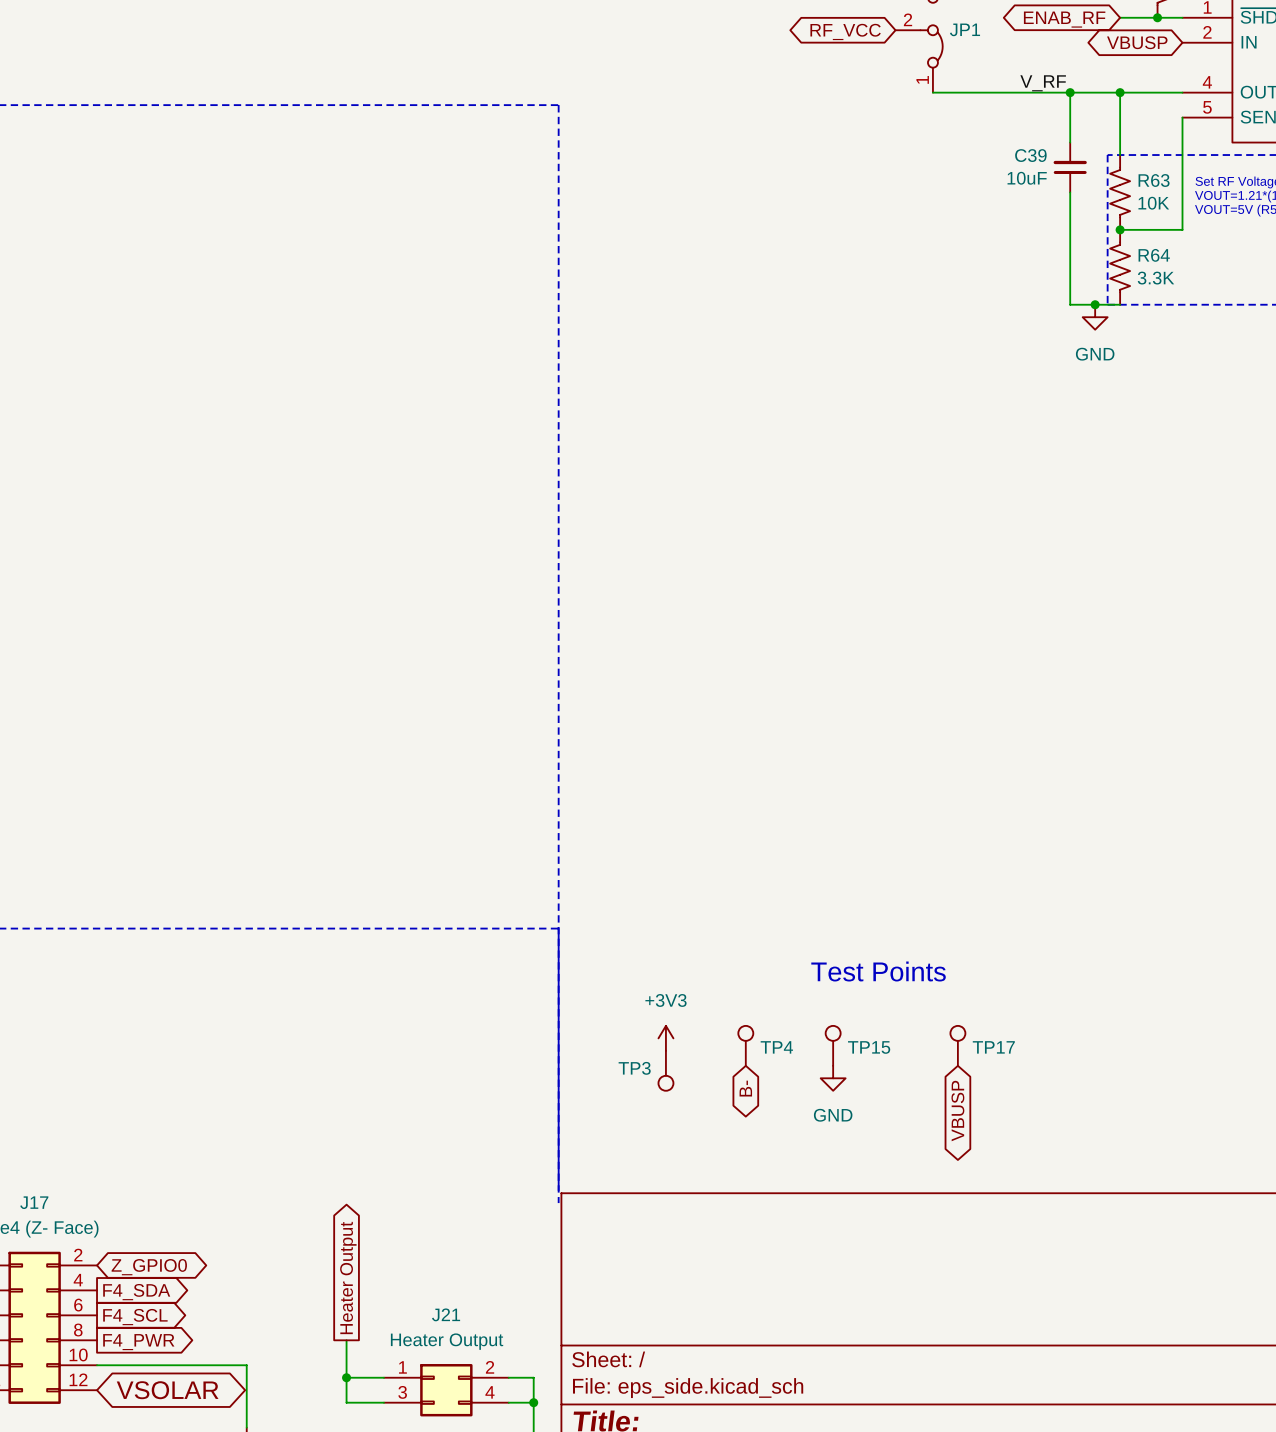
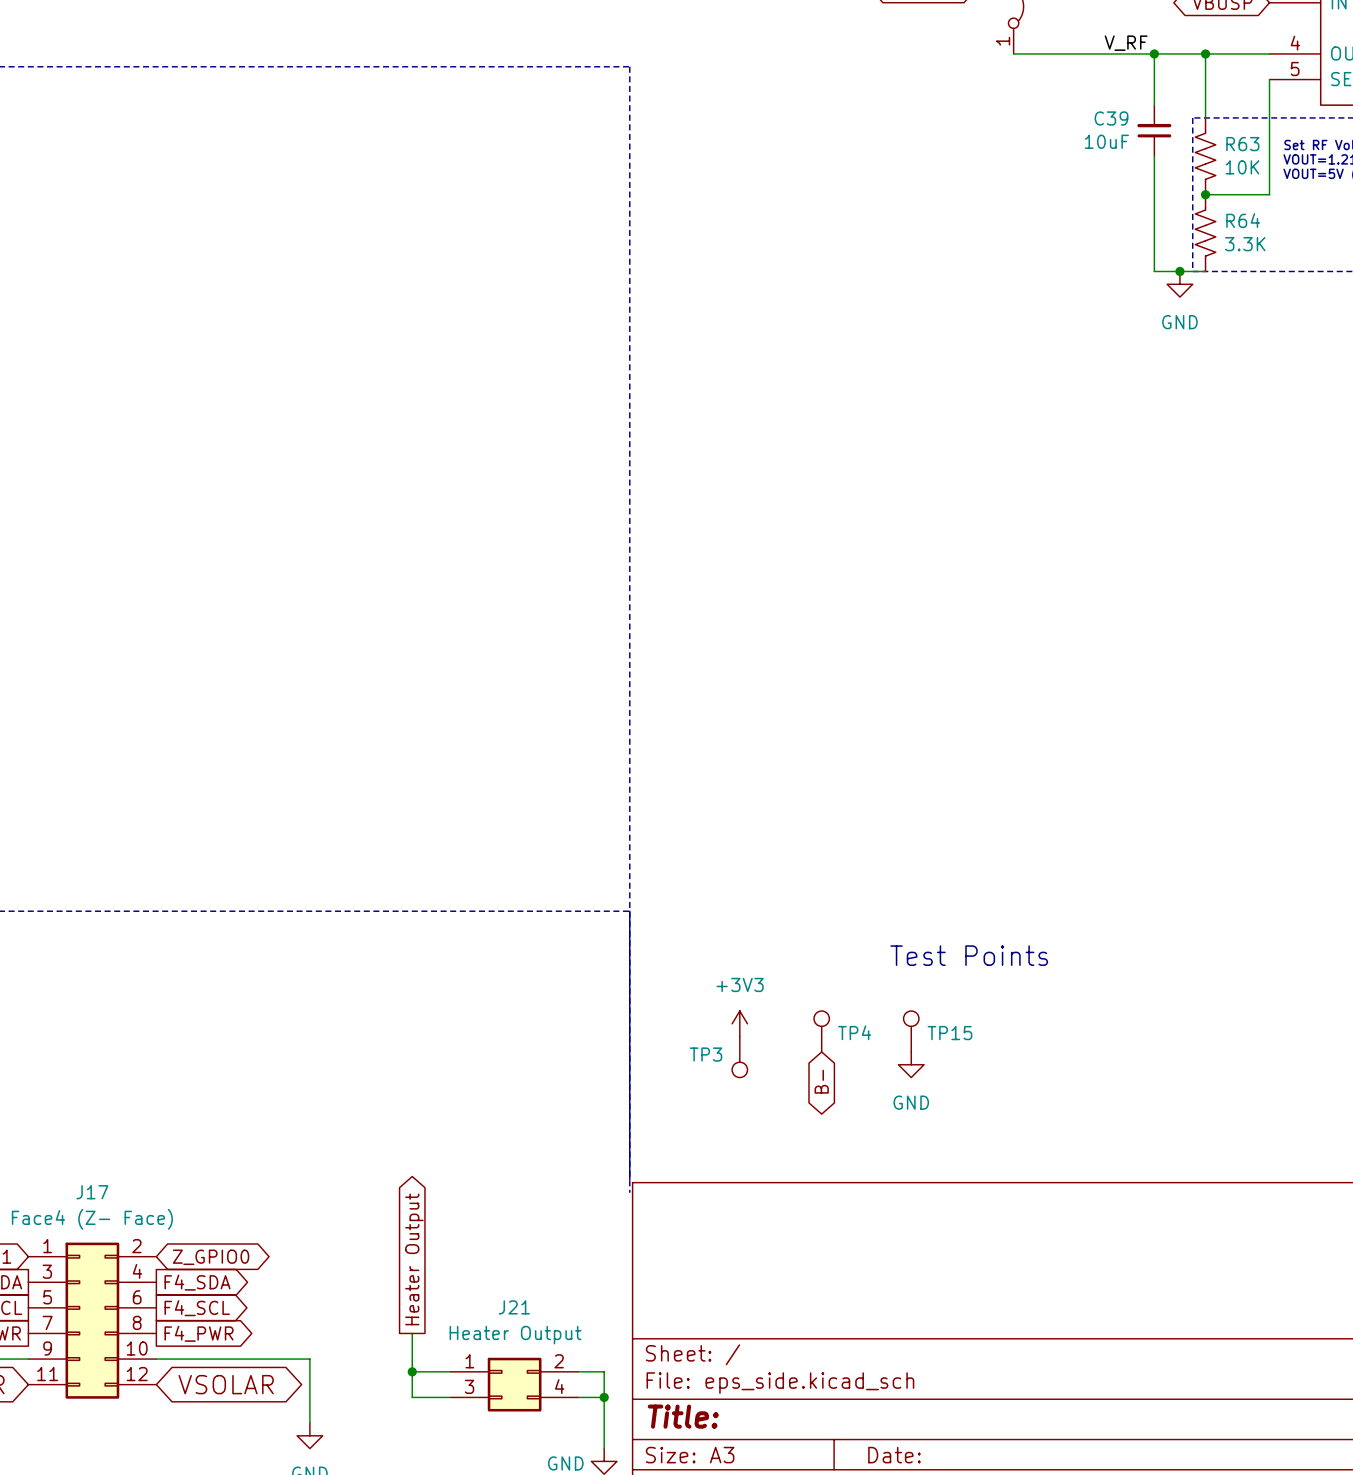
TP17: (957, 1045) -> none
global label: VBUSP (957, 1111) -> none

